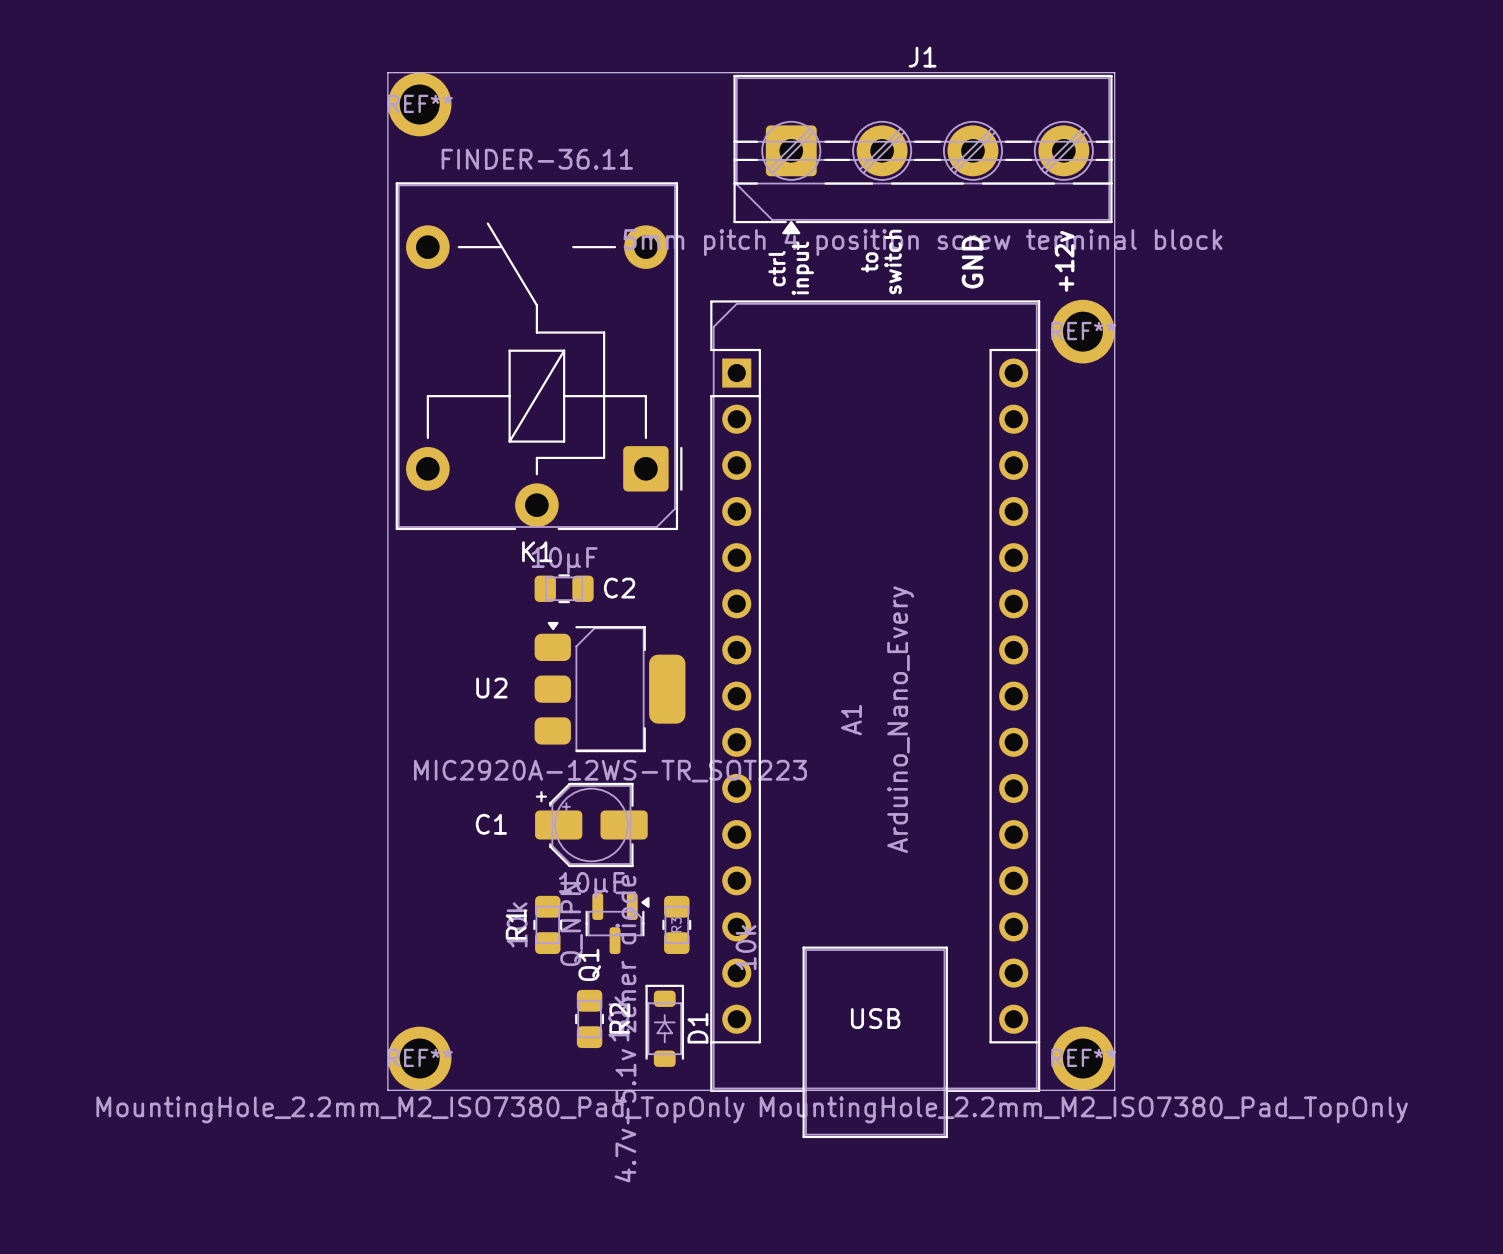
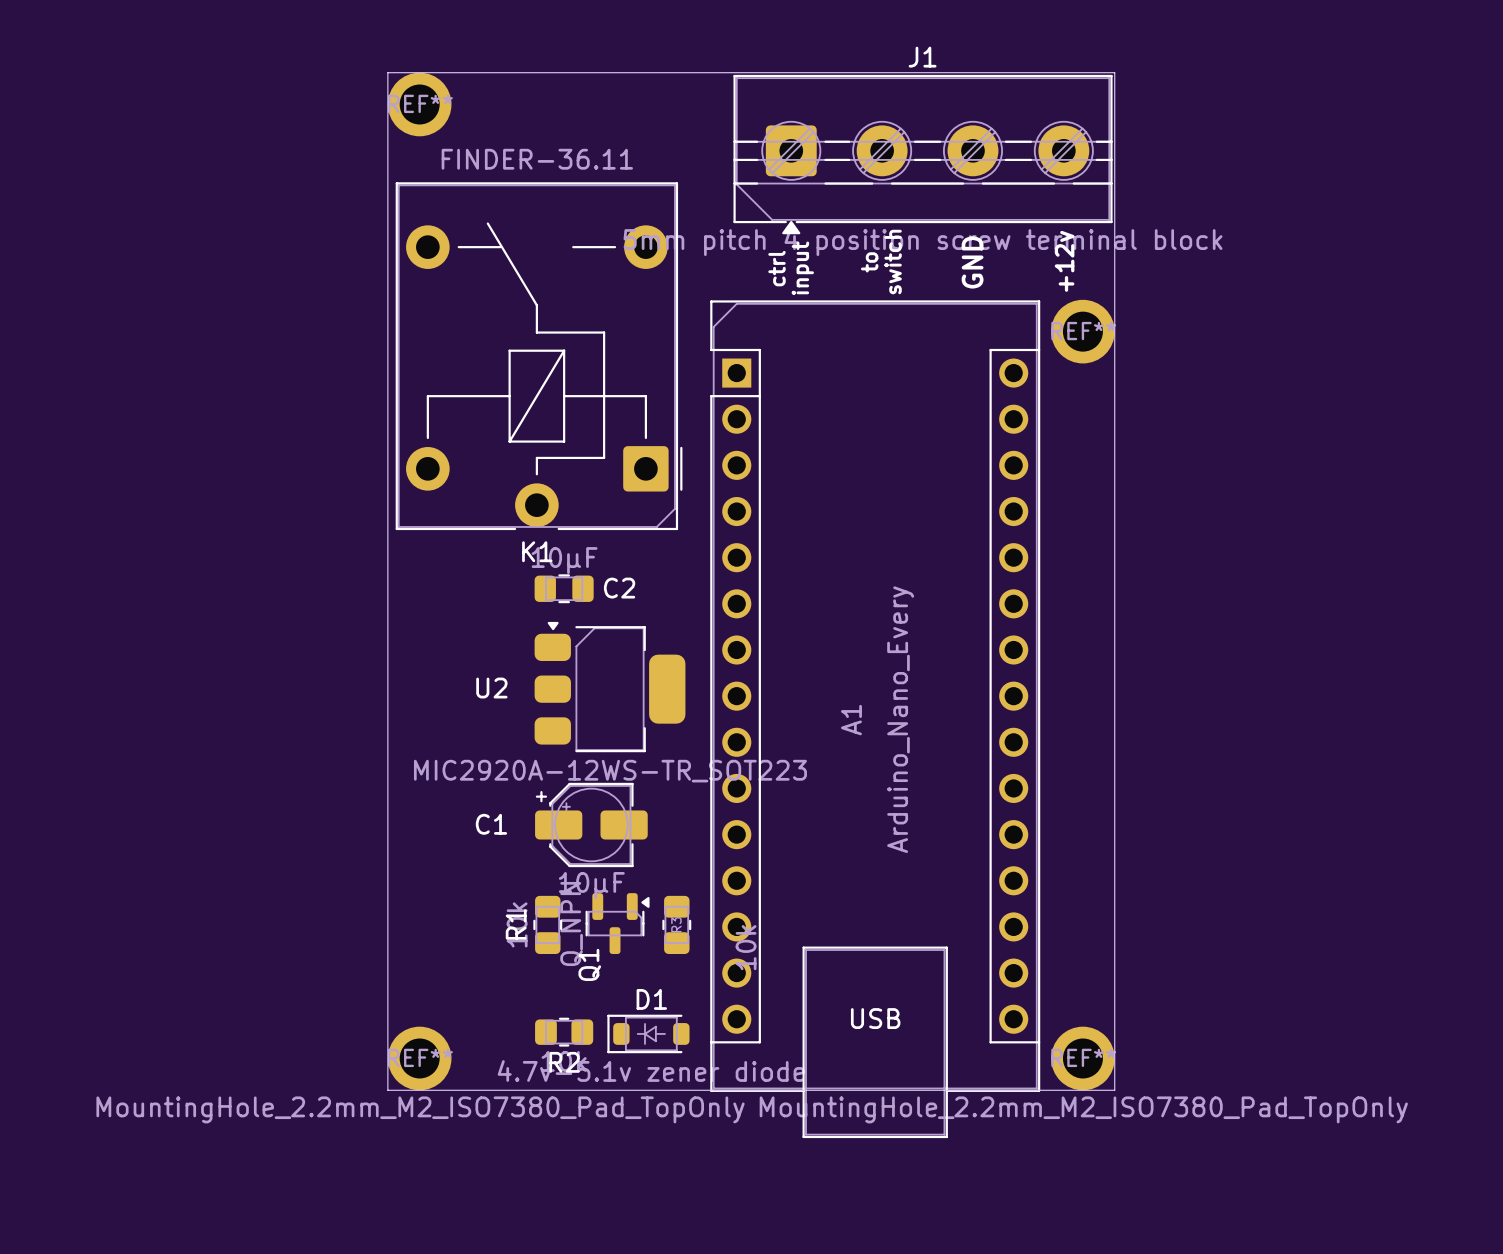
R2 rotation: 0° (589, 1018) -> 90° clockwise (564, 1032)
D1 rotation: 0° (664, 1025) -> 90° counterclockwise (648, 1033)

